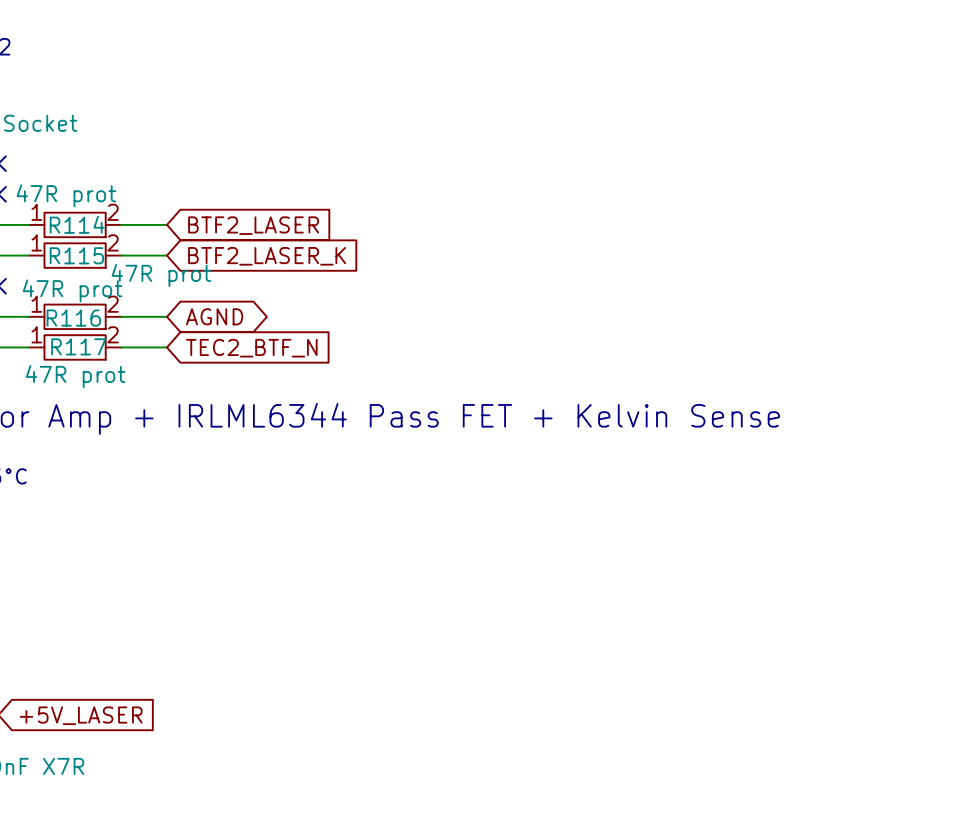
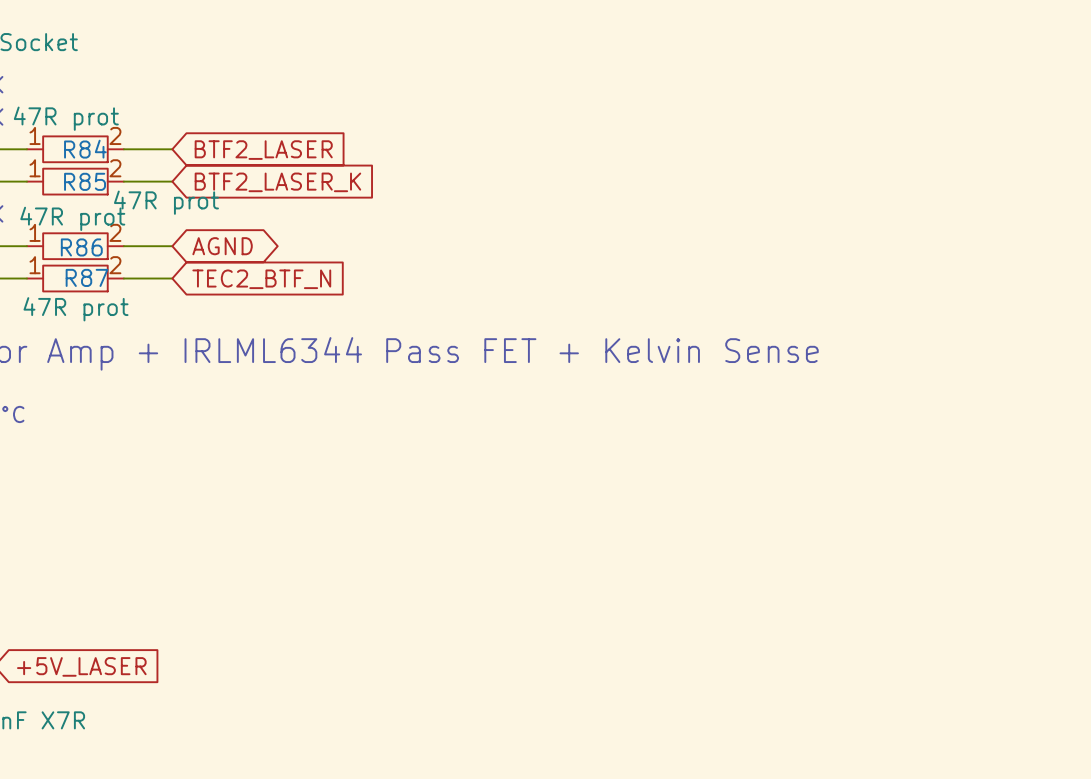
R114 name: R114 (77, 224) -> R84 (85, 149)
R115 name: R115 (76, 255) -> R85 (85, 181)
R116 name: R116 (73, 318) -> R86 (81, 247)
R117 name: R117 (78, 346) -> R87 (87, 277)

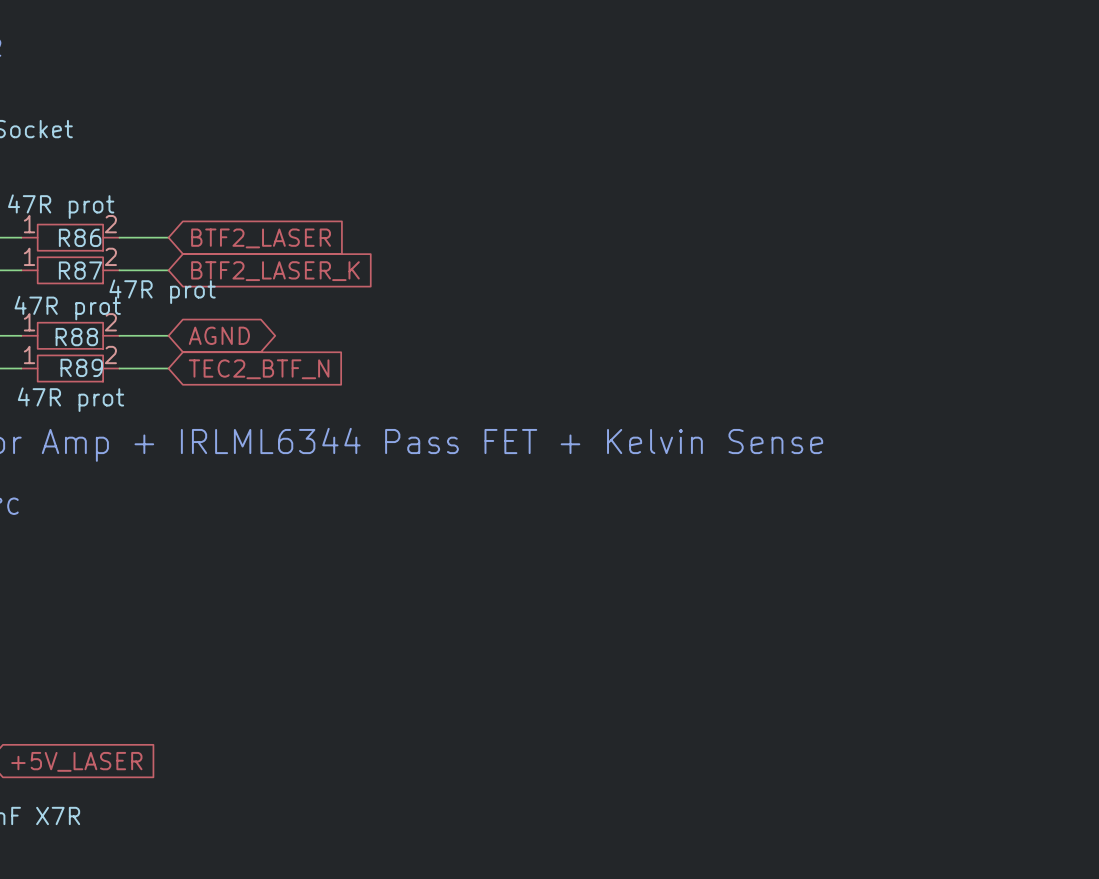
R84 name: R84 (85, 149) -> R86 (80, 237)
R85 name: R85 (85, 181) -> R87 (80, 270)
R86 name: R86 (81, 247) -> R88 (76, 337)
R87 name: R87 (87, 277) -> R89 (81, 367)

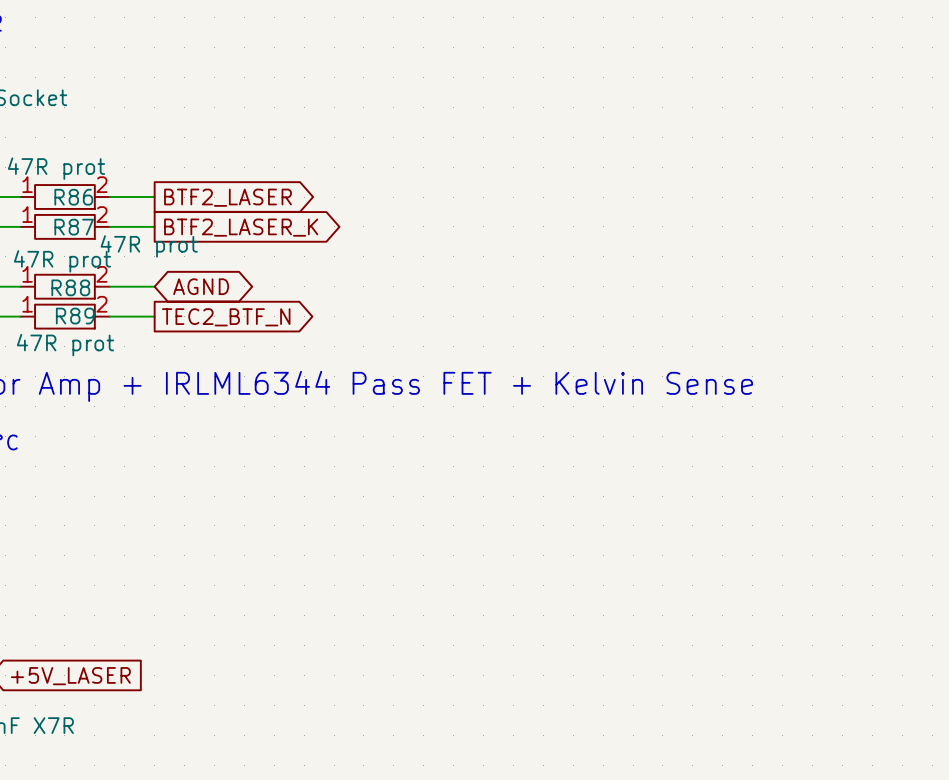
global label shape: input (261, 238) -> output (228, 197)
global label shape: input (275, 271) -> output (241, 227)
global label shape: input (259, 369) -> output (226, 317)

